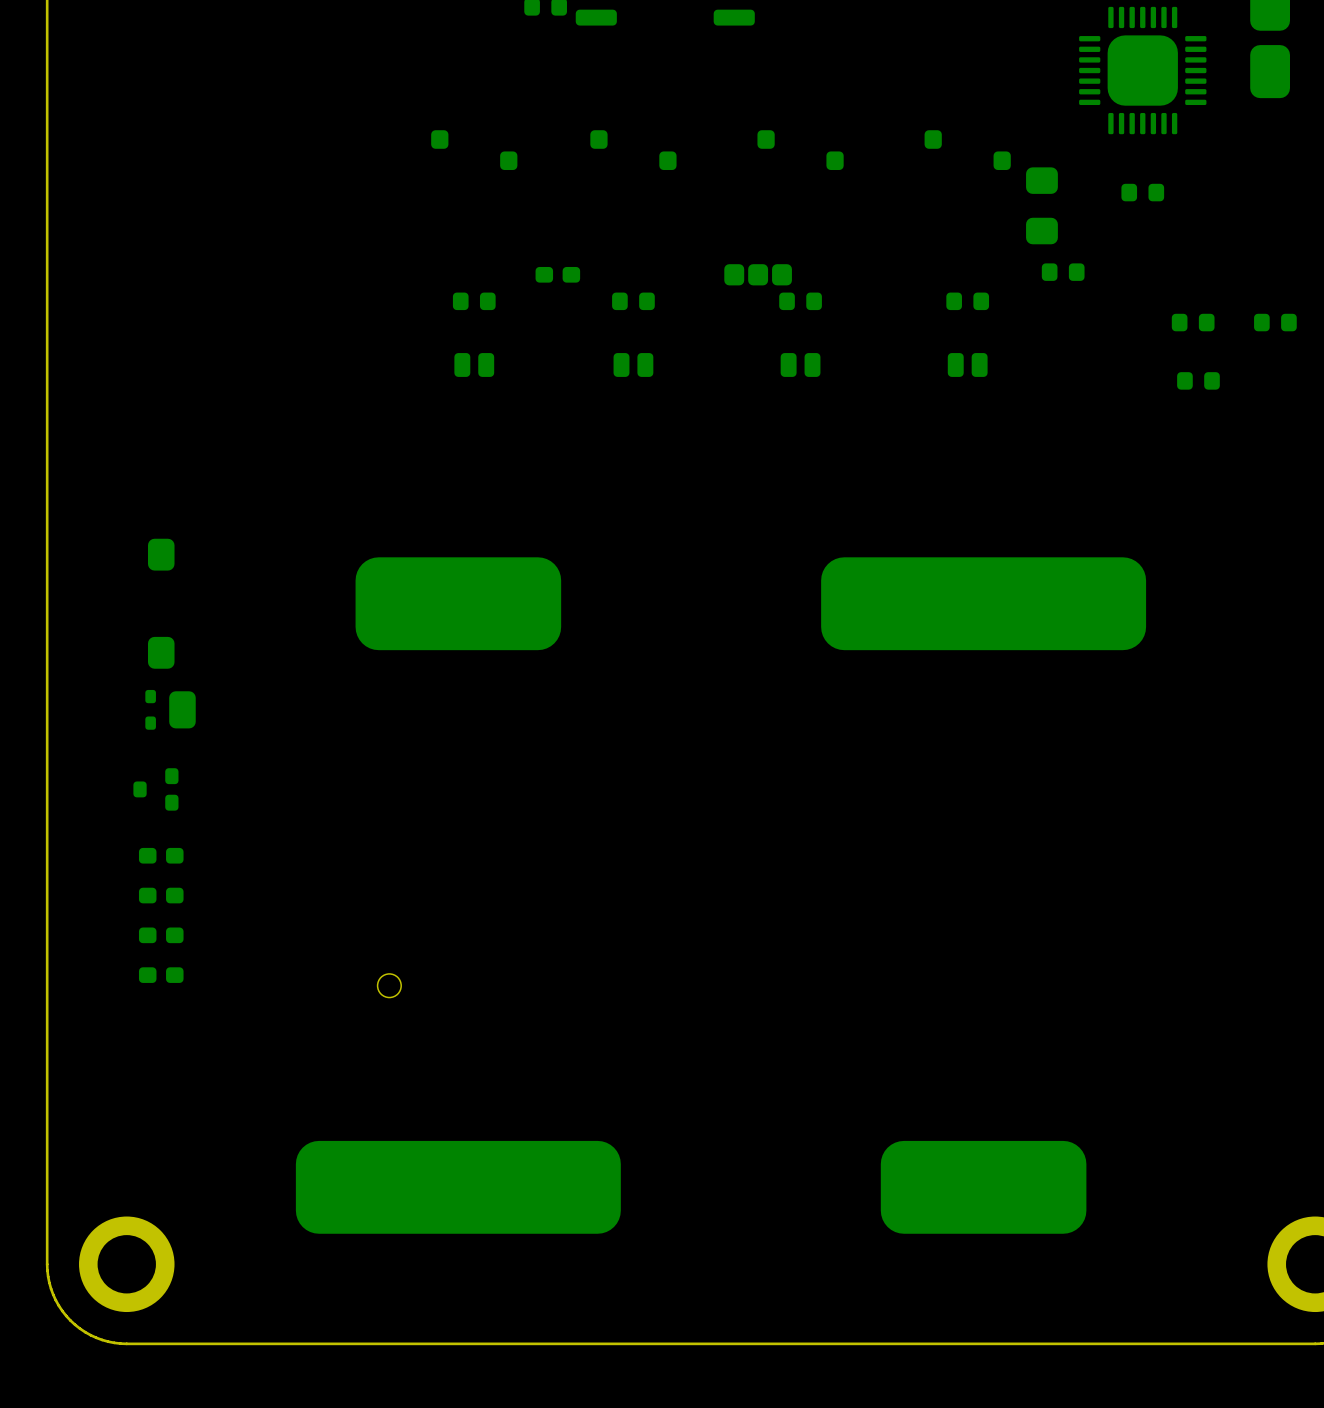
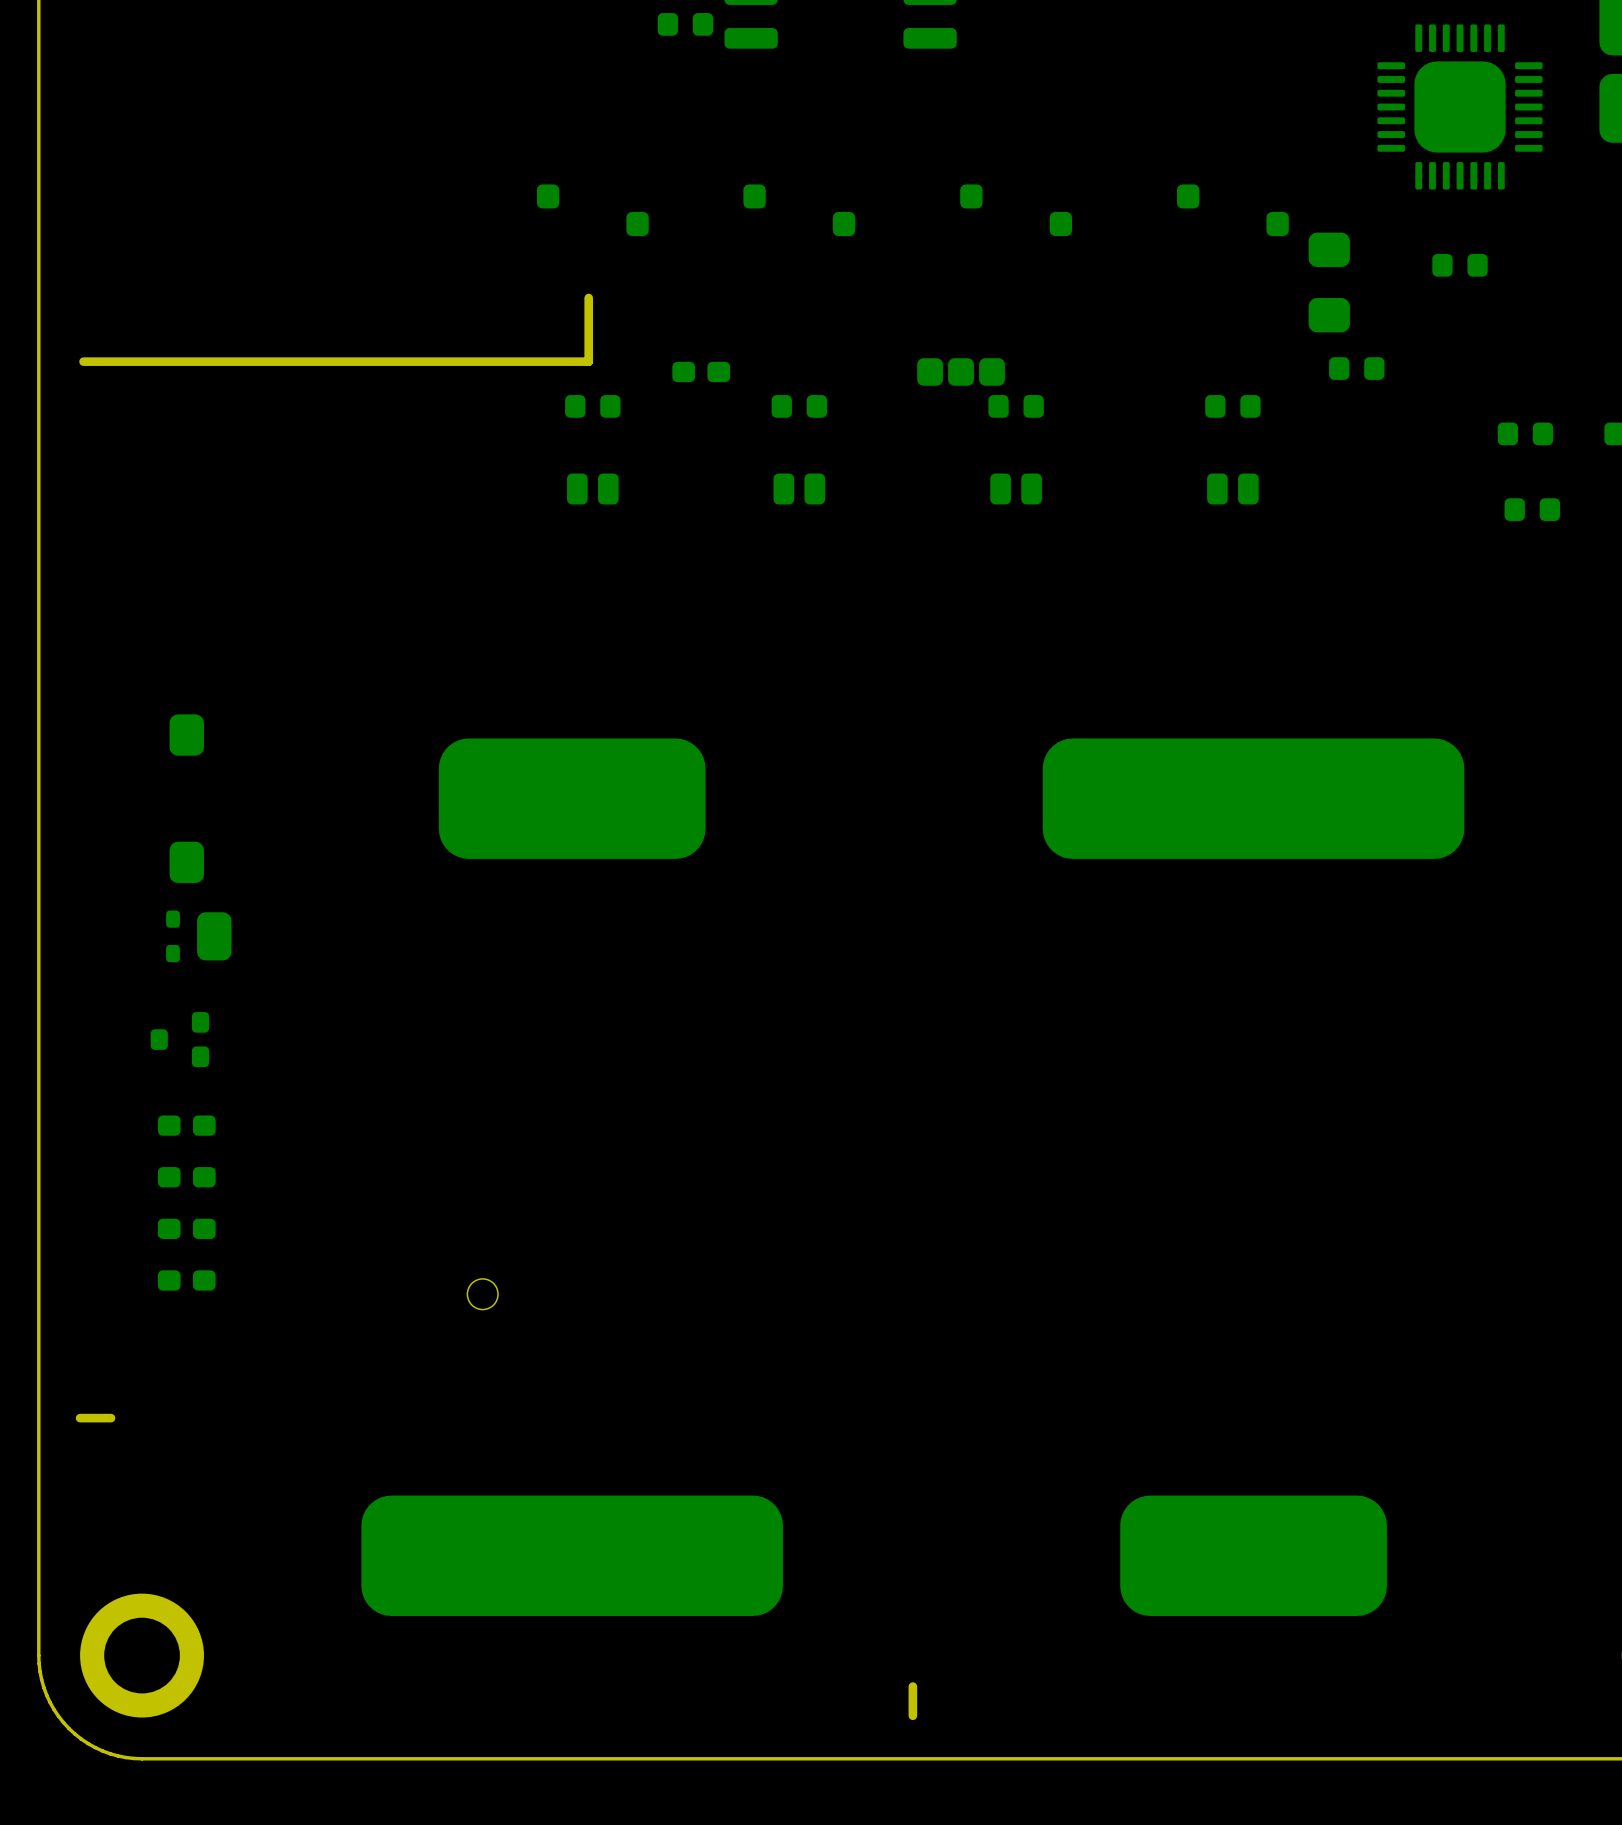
board edge: none -> (588, 297) (588, 361) (83, 361)
board edge: none -> (111, 1418) (80, 1418)
board edge: none -> (912, 1686) (912, 1715)

